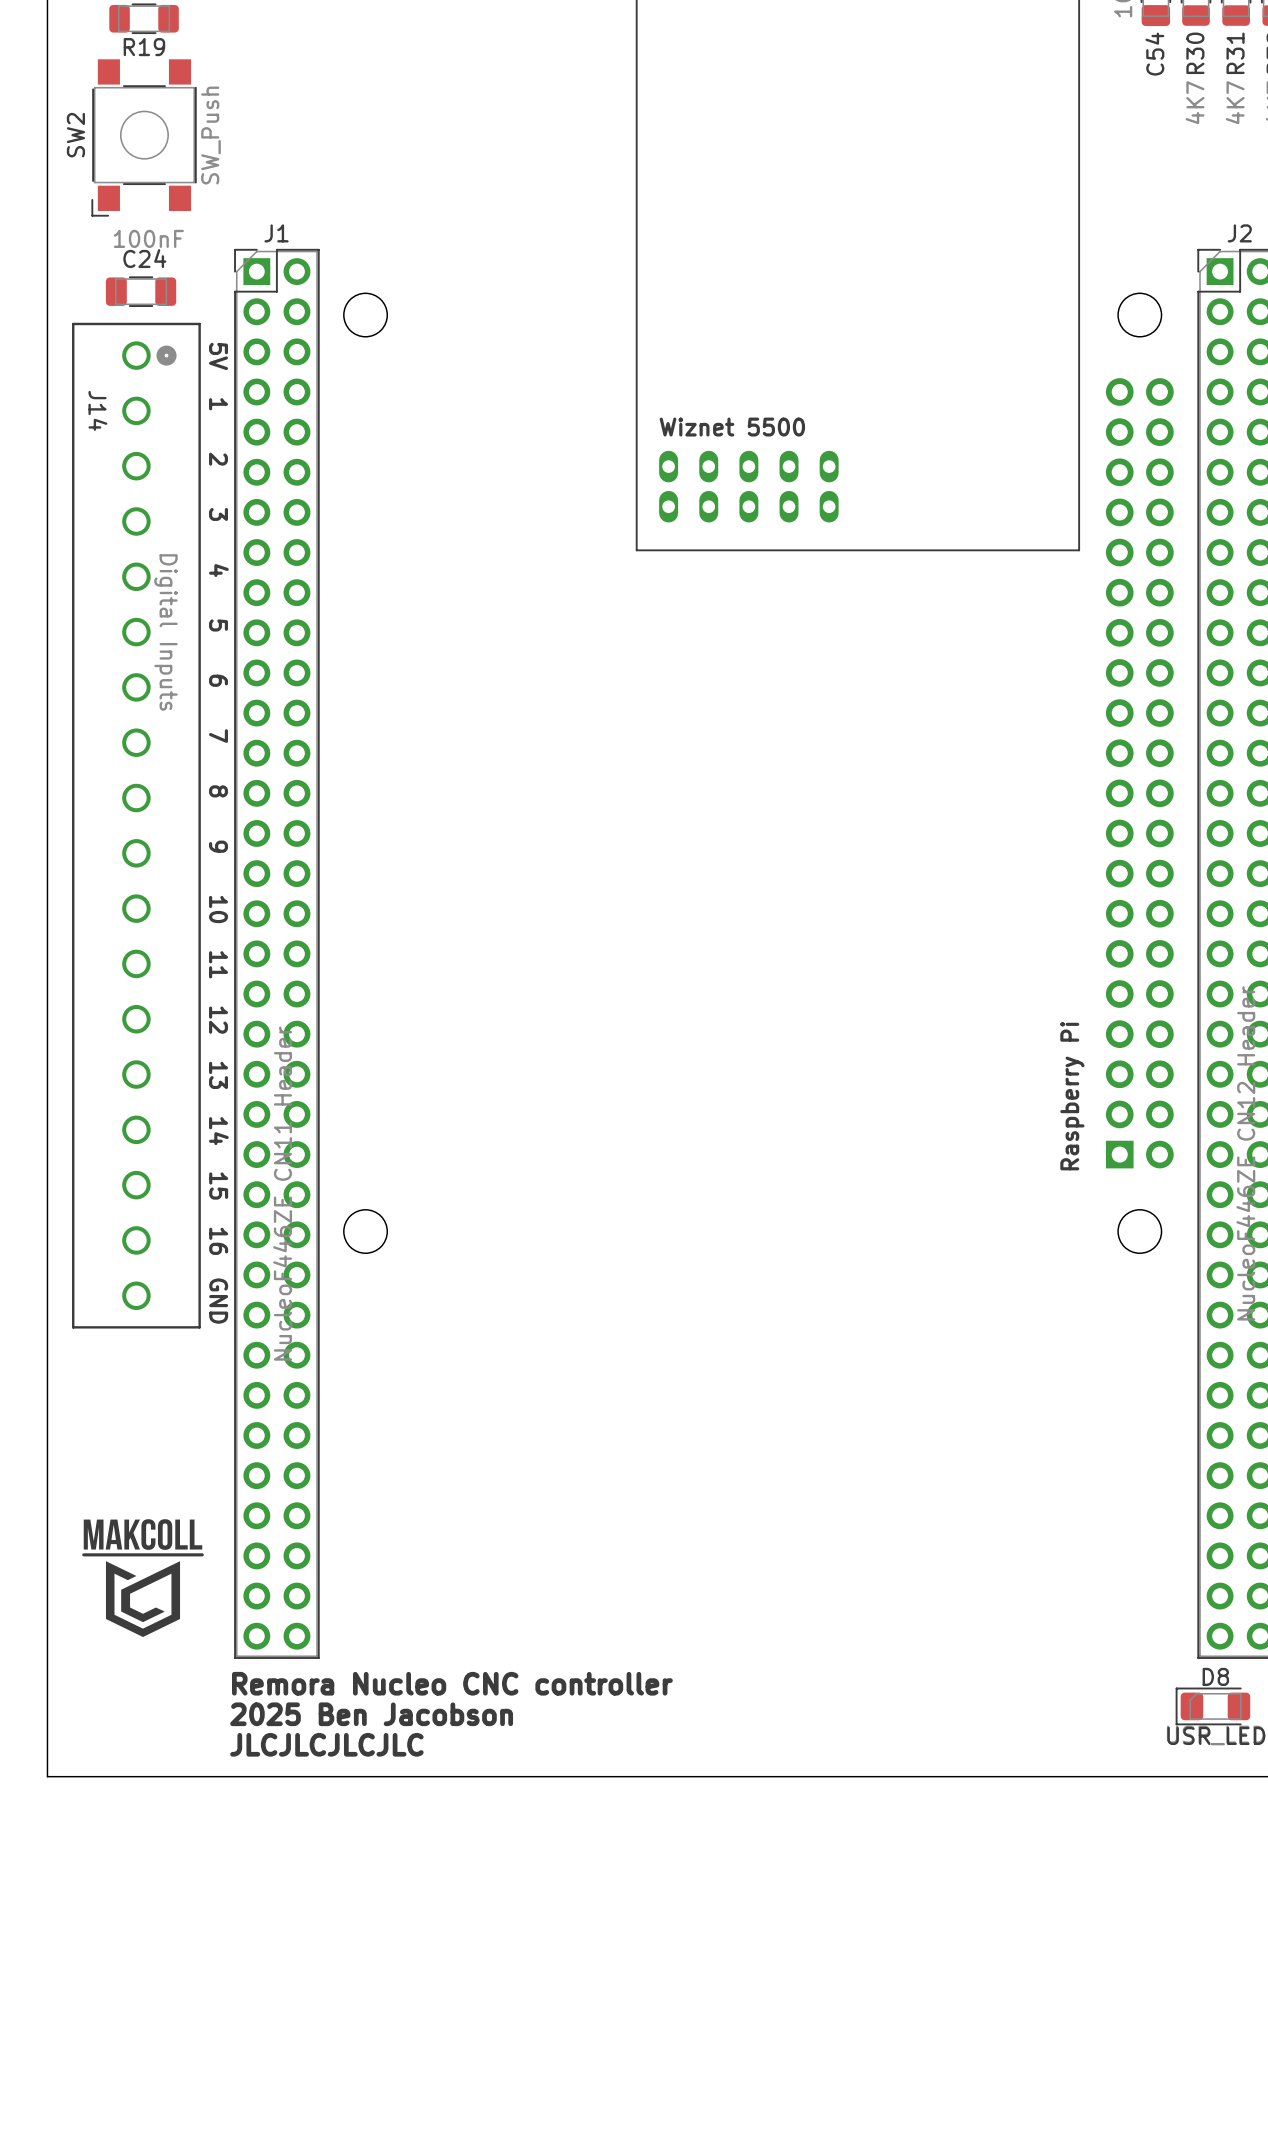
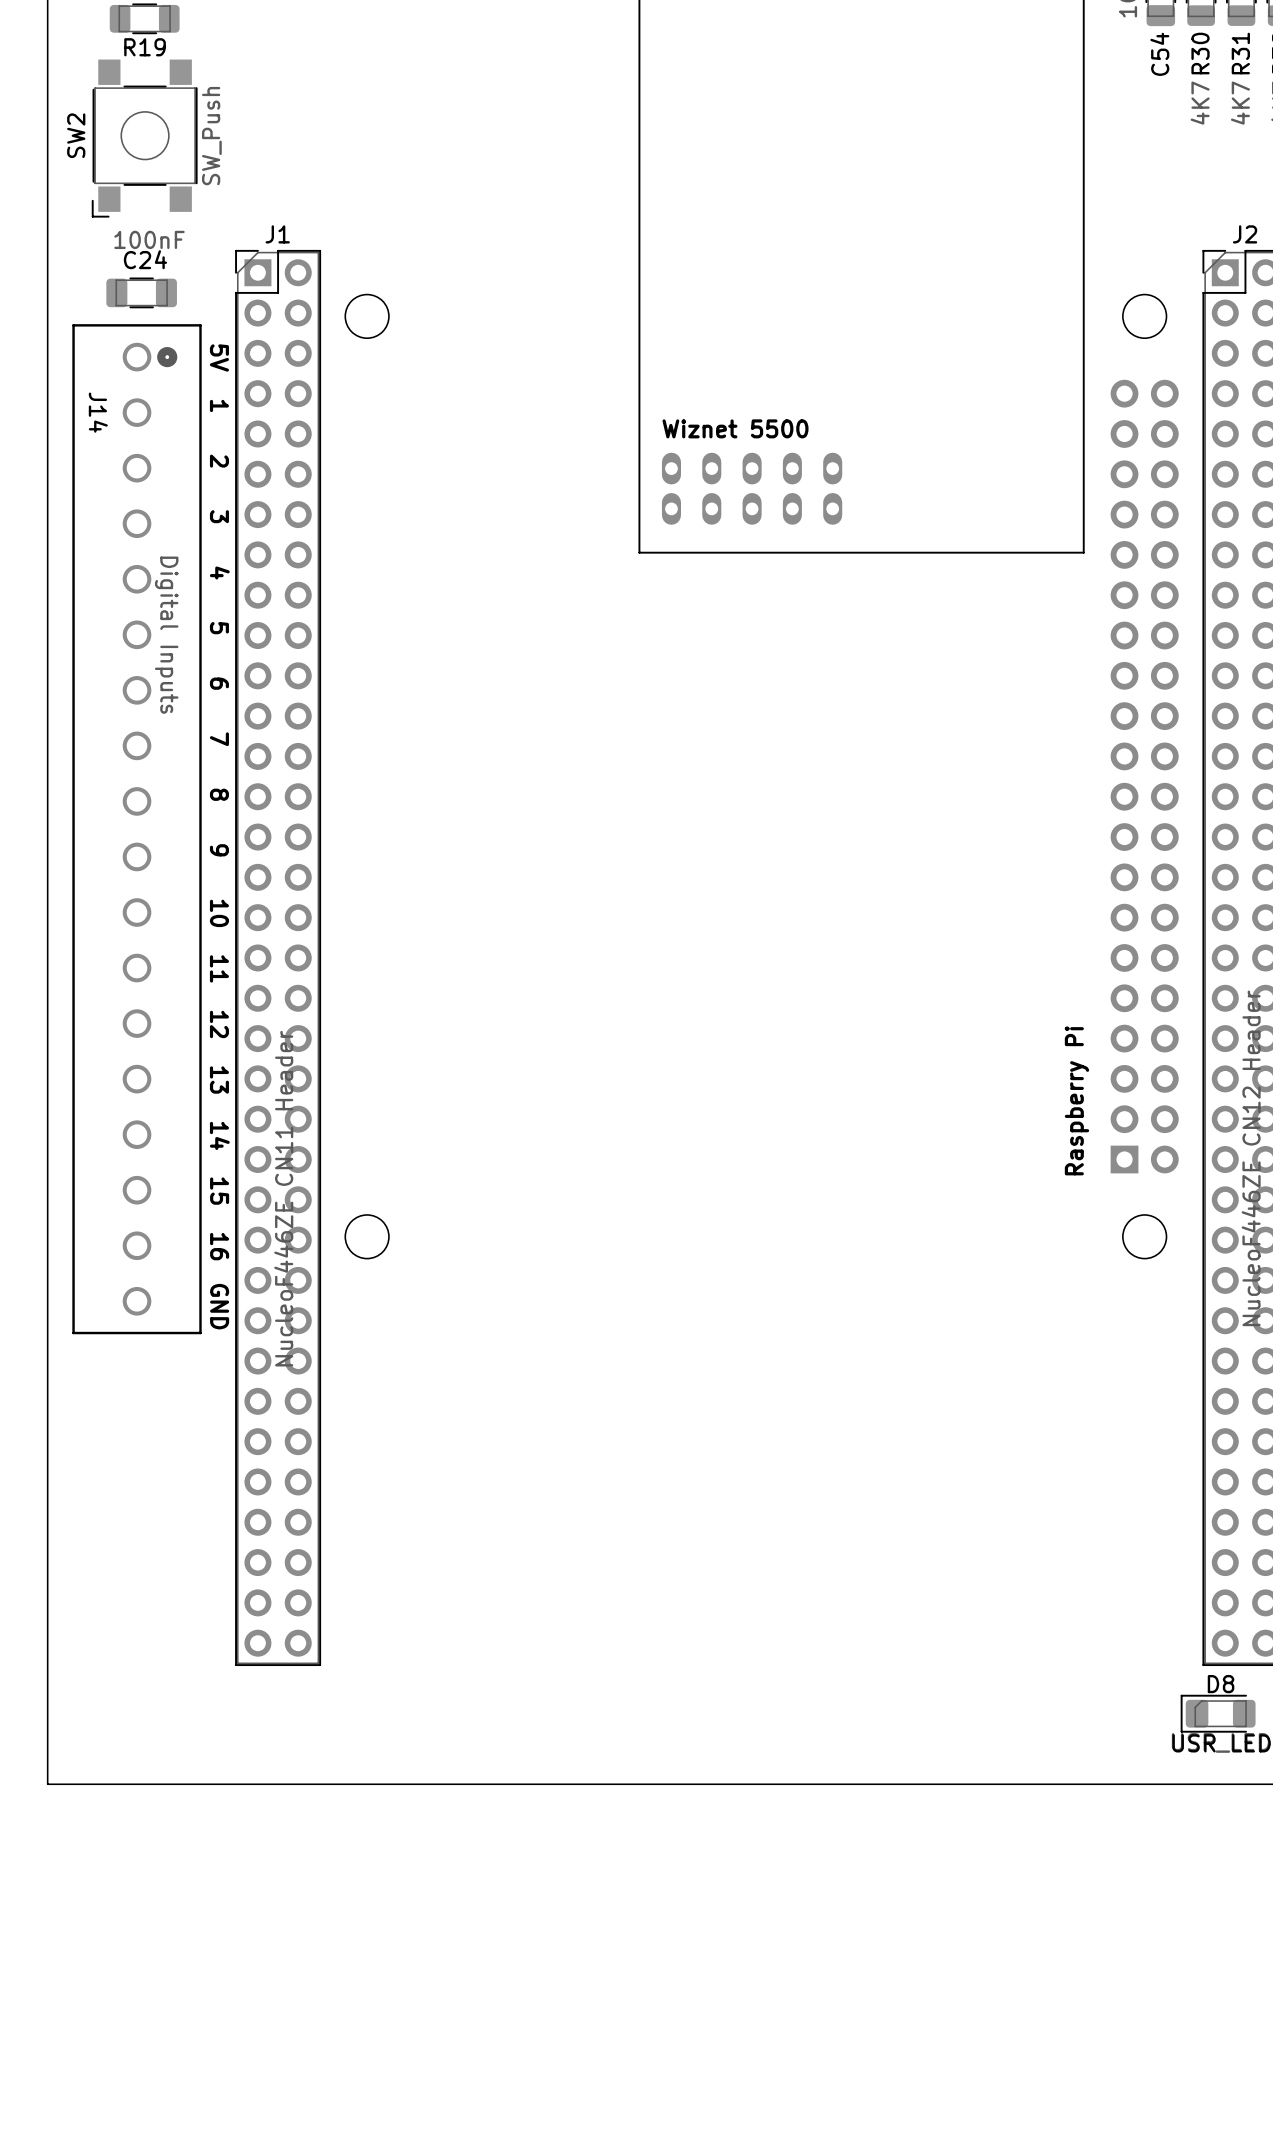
drawing: [83, 1519, 203, 1638] -> none
line: (83, 1554) (202, 1554) -> none
text: Remora Nucleo CNC controller (452, 1683) -> none
text: 2025 Ben Jacobson (371, 1714) -> none
text: JLCJLCJLCJLC (326, 1744) -> none

